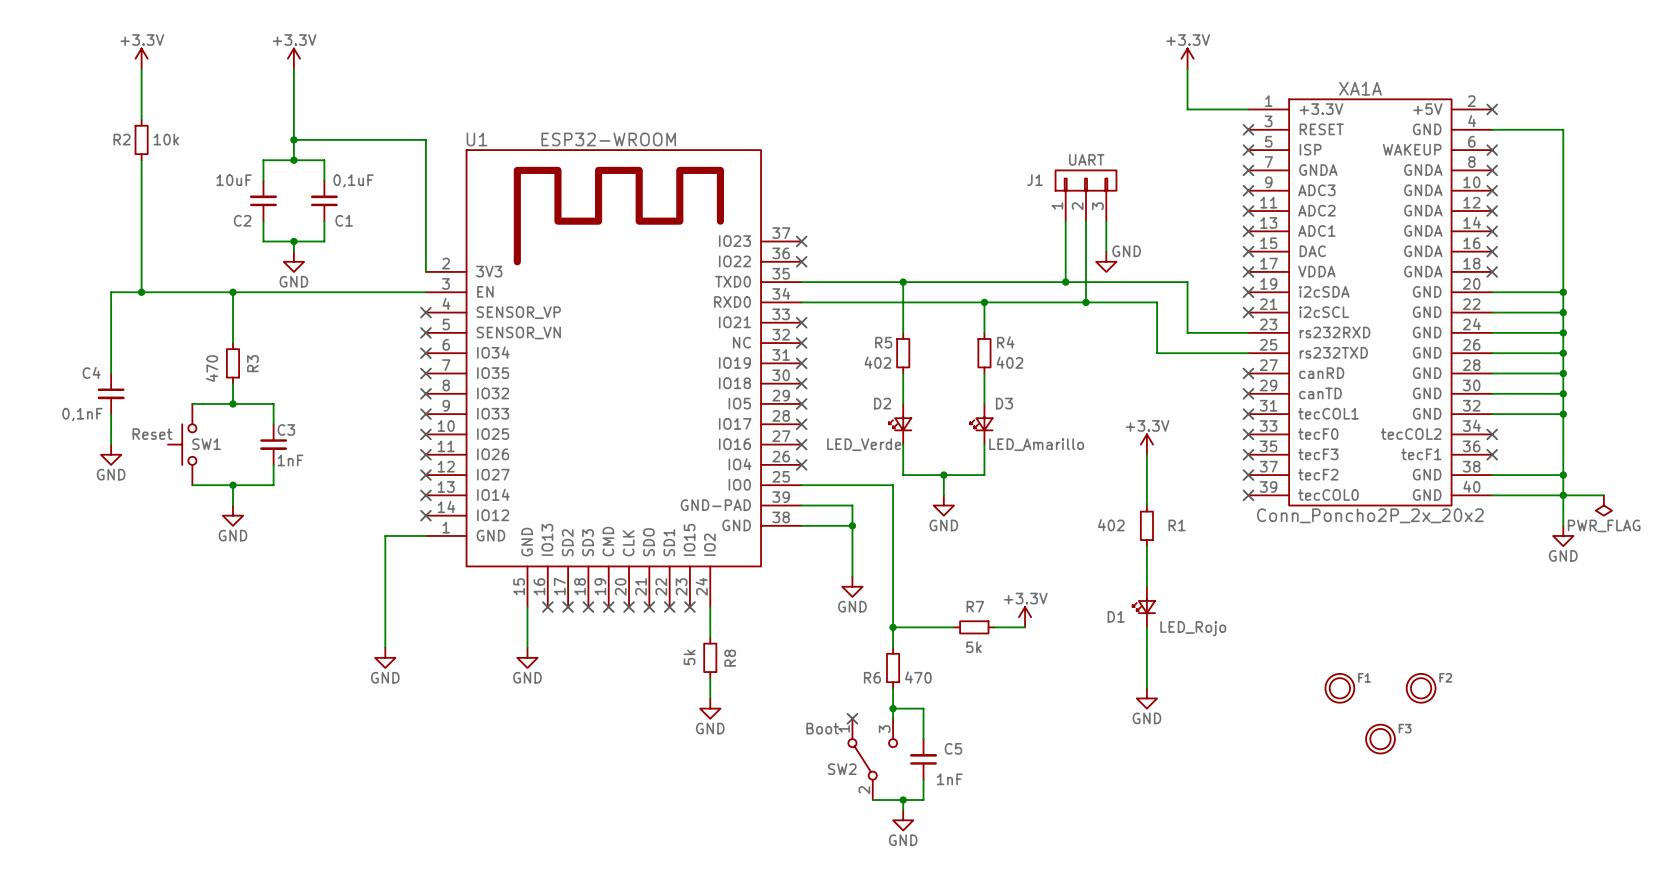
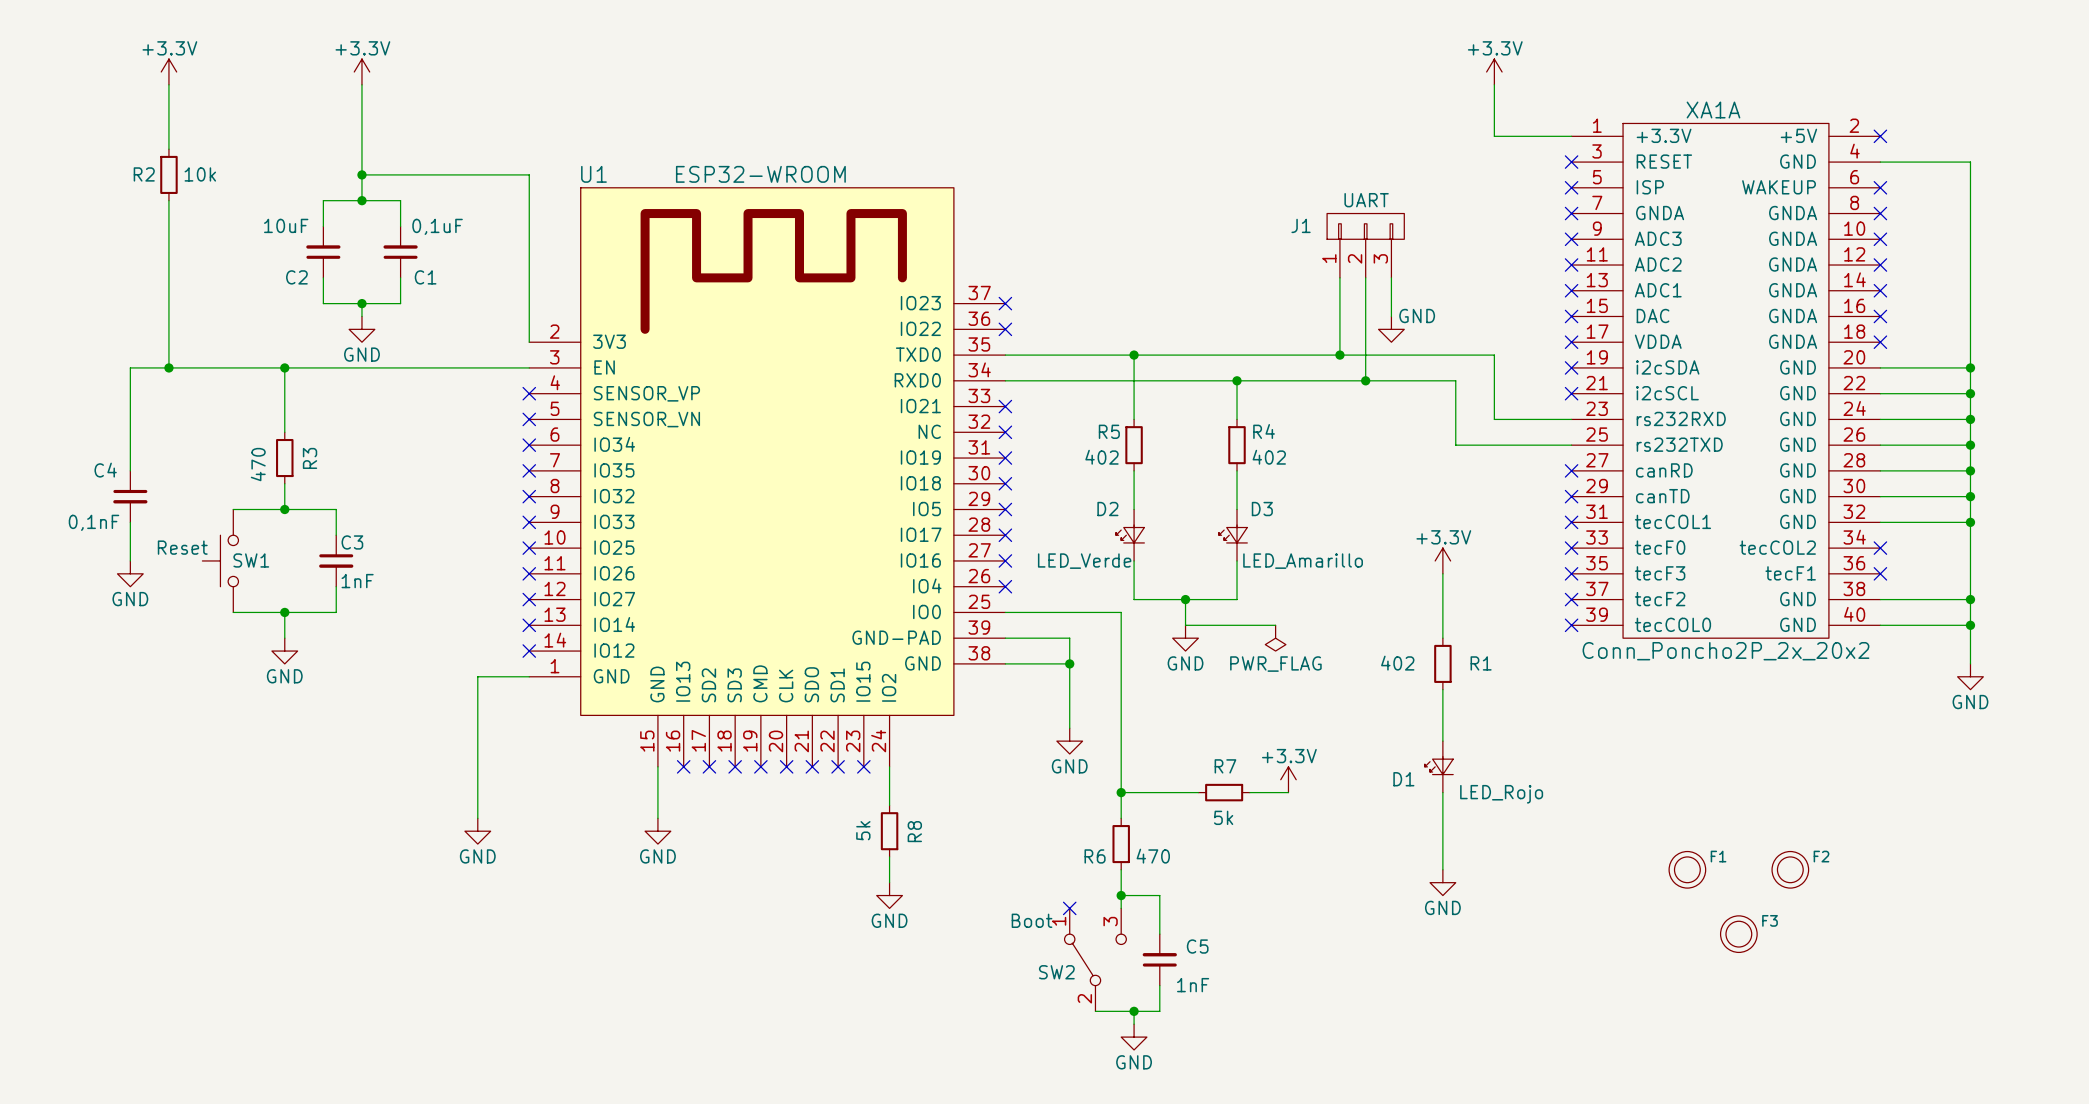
wire: none -> (1185, 625) (1275, 625)
wire: (1563, 495) (1603, 495) -> none
power symbol: none -> PWR_FLAG (1275, 638)
power symbol: PWR_FLAG (1603, 505) -> none

